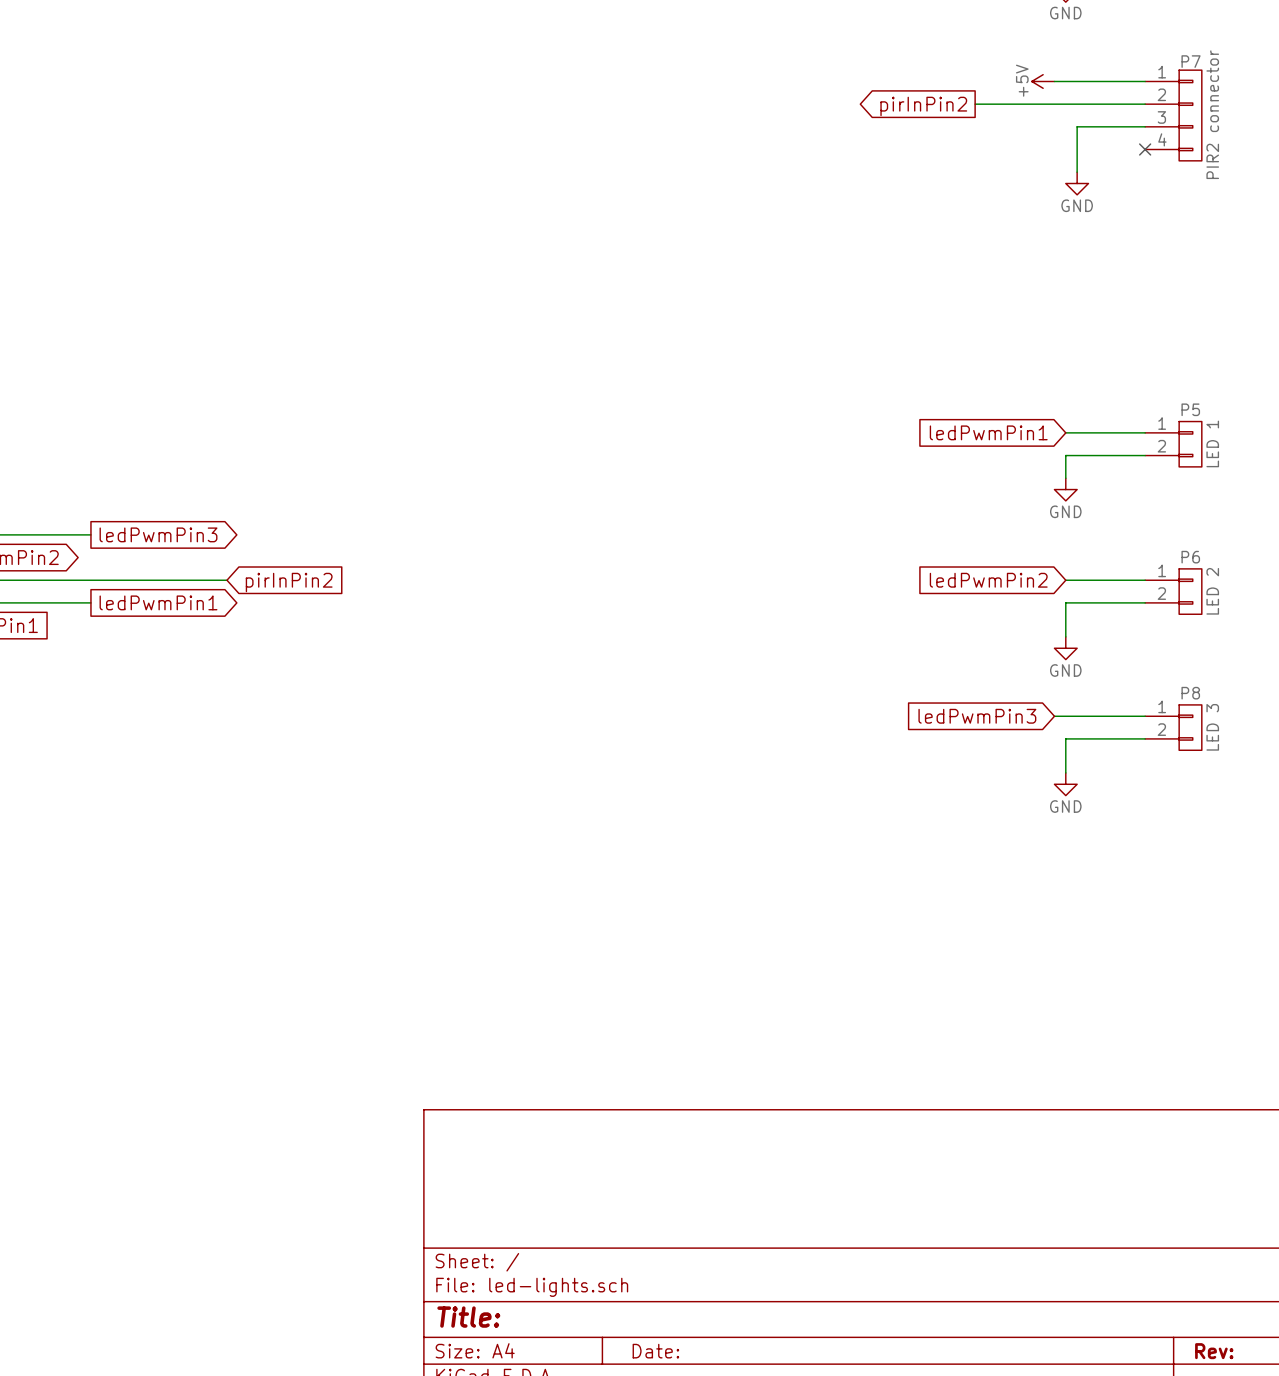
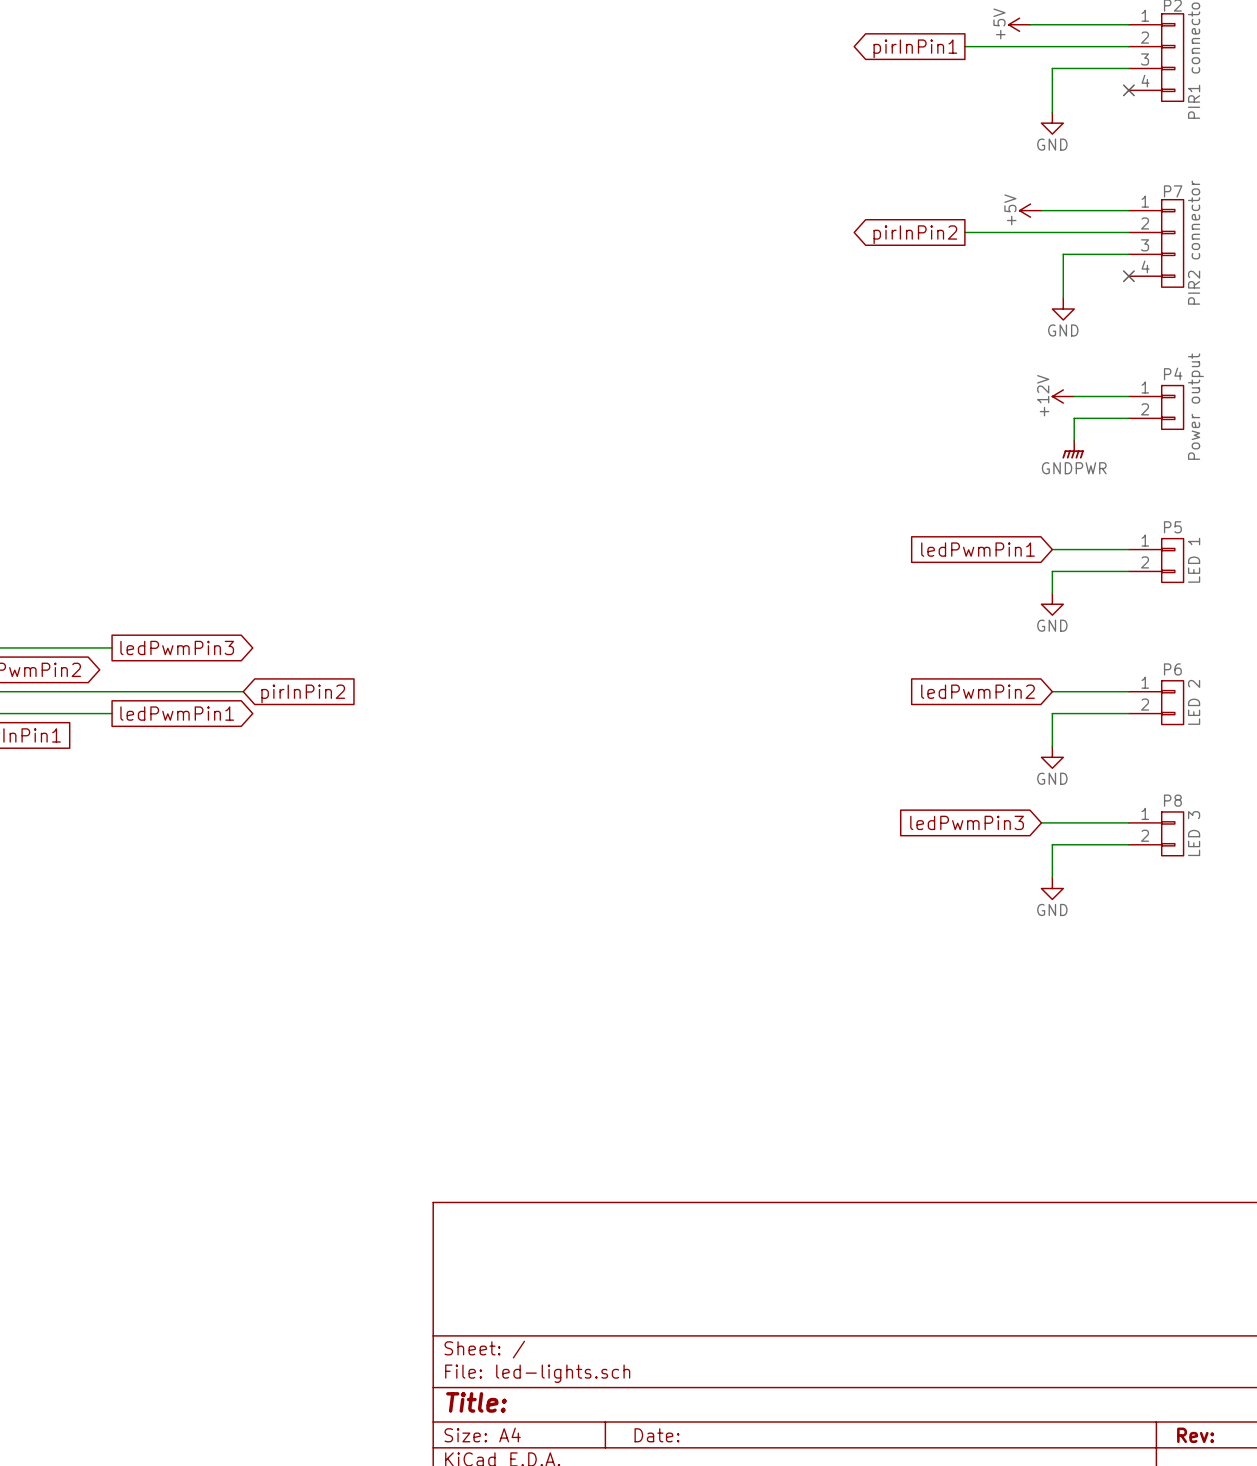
power symbol: none -> +12V (1063, 396)
wire: none -> (1074, 396) (1128, 396)
P4: none -> Power output (1156, 407)
wire: none -> (1128, 418) (1074, 418) (1074, 440)
power symbol: none -> GNDPWR (1073, 449)

